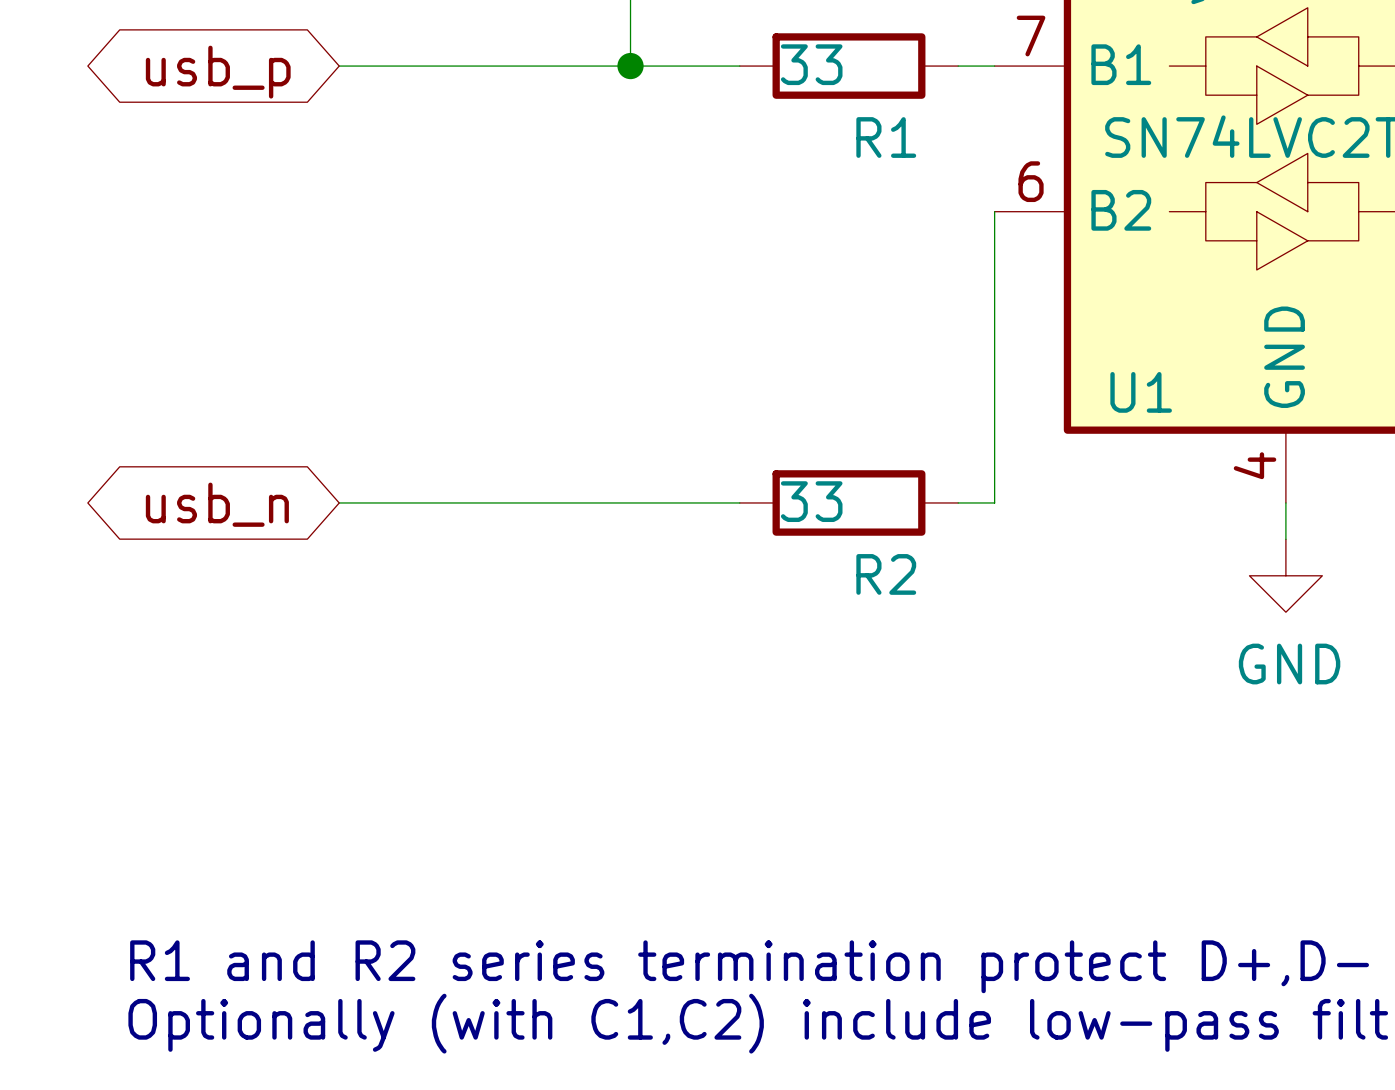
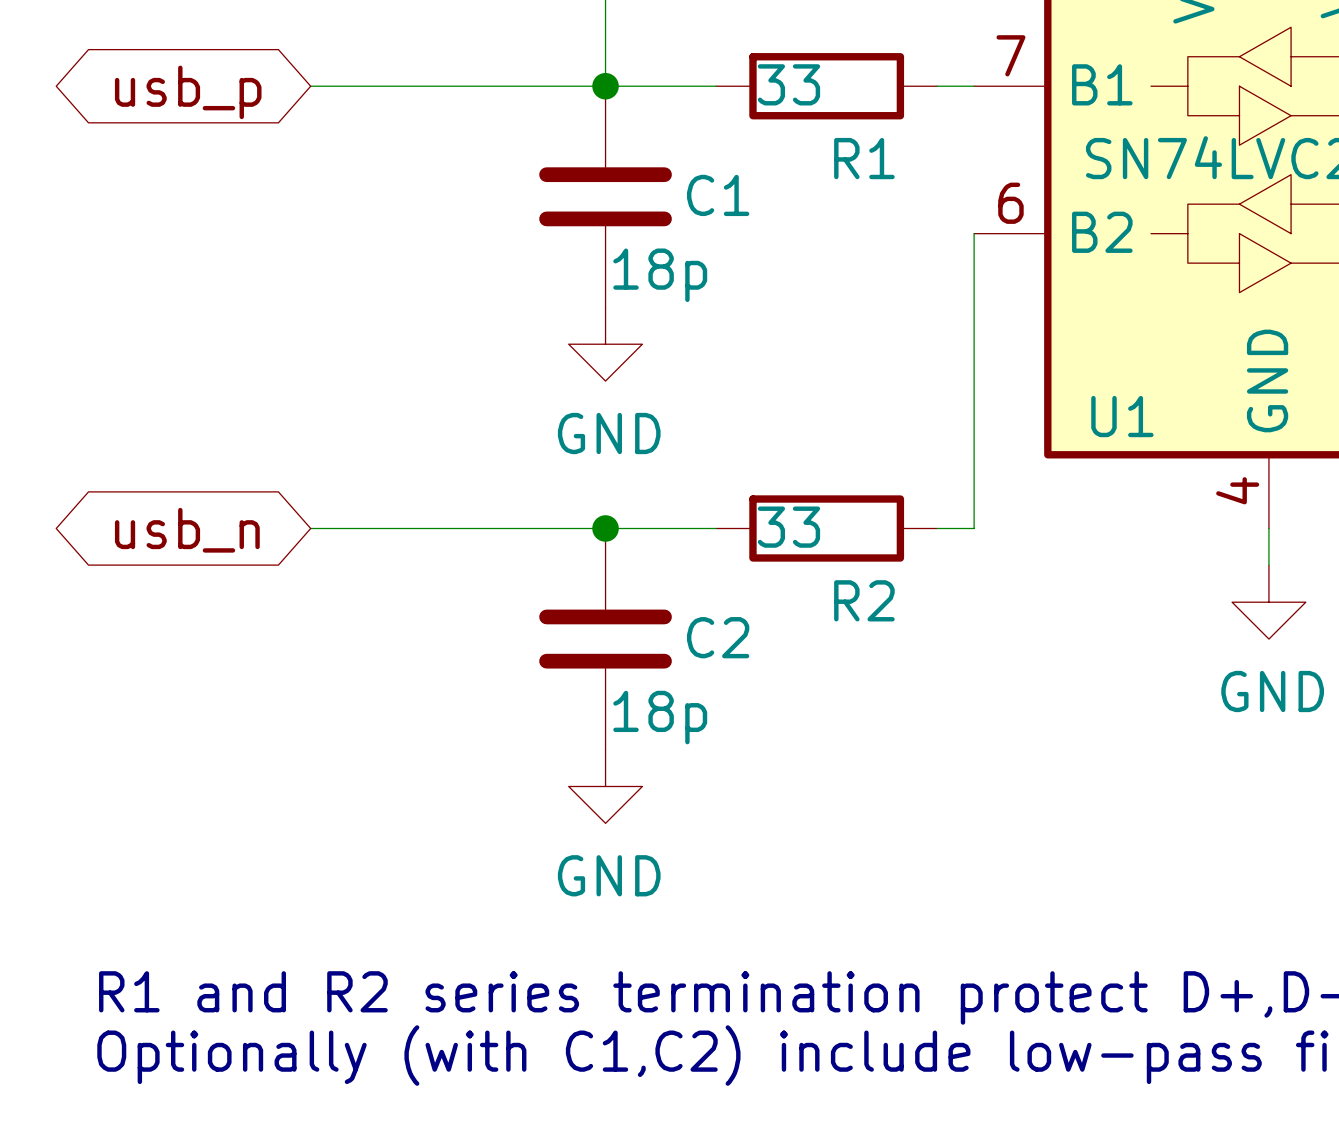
C1: none -> 18p (605, 196)
power symbol: none -> GND (605, 344)
junction: none -> (605, 528)
C2: none -> 18p (605, 639)
power symbol: none -> GND (605, 786)

